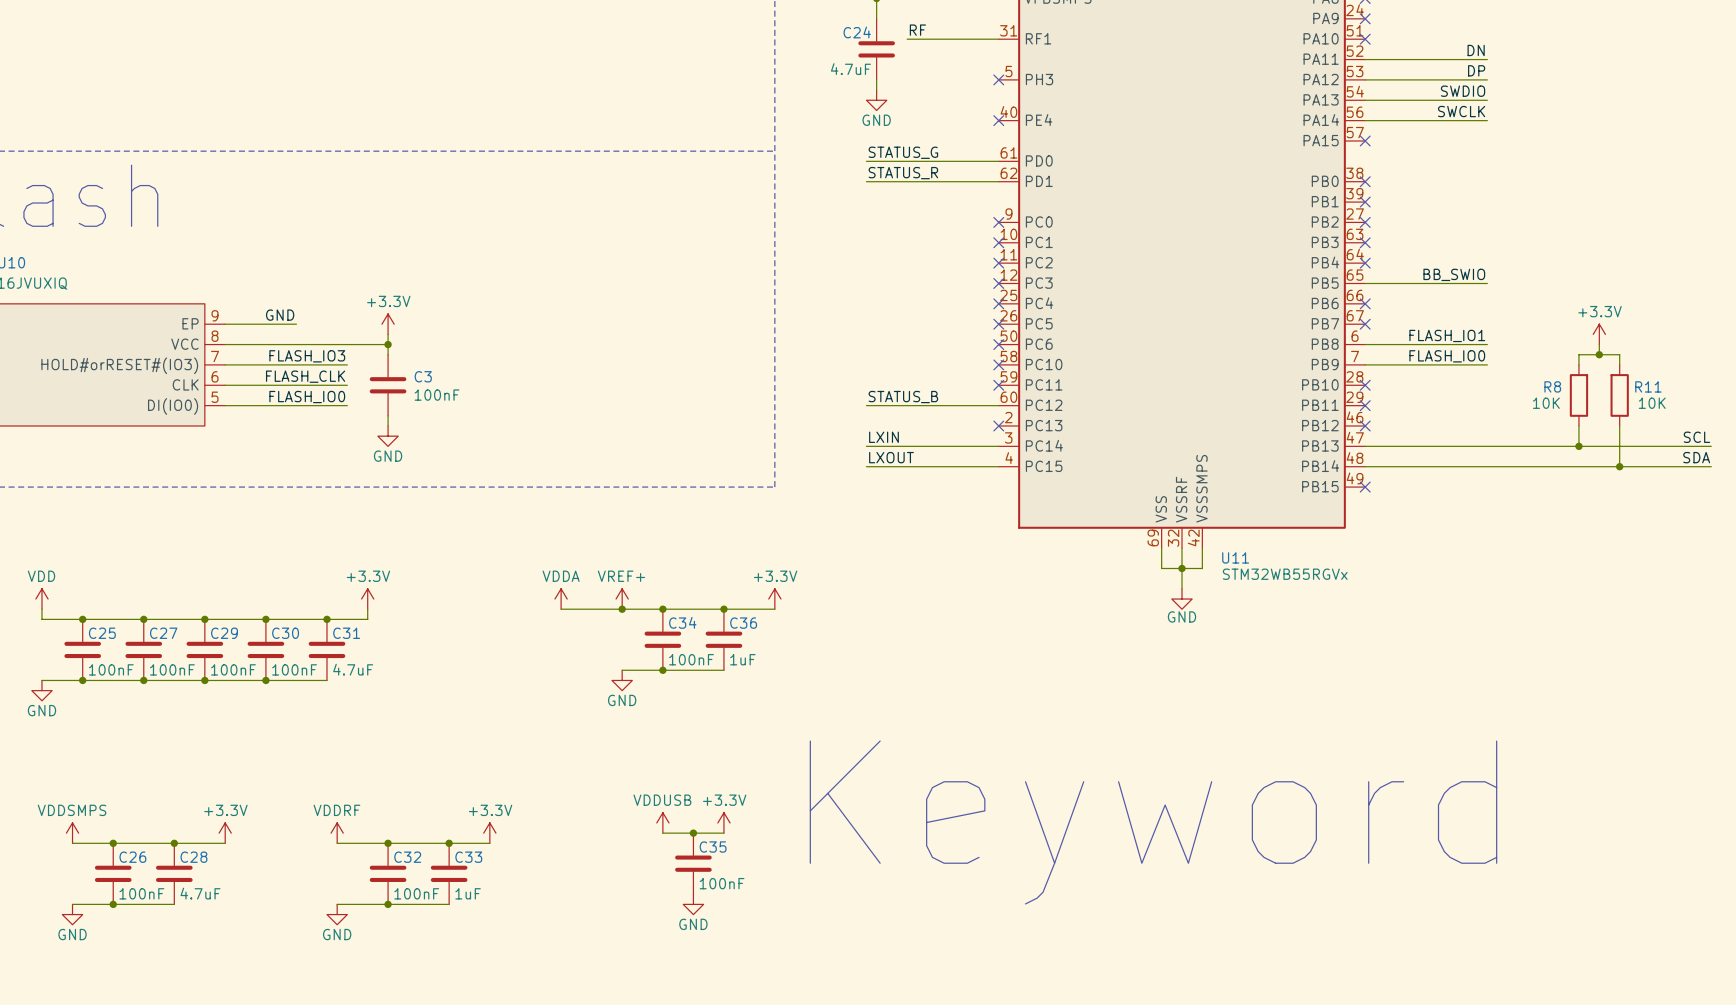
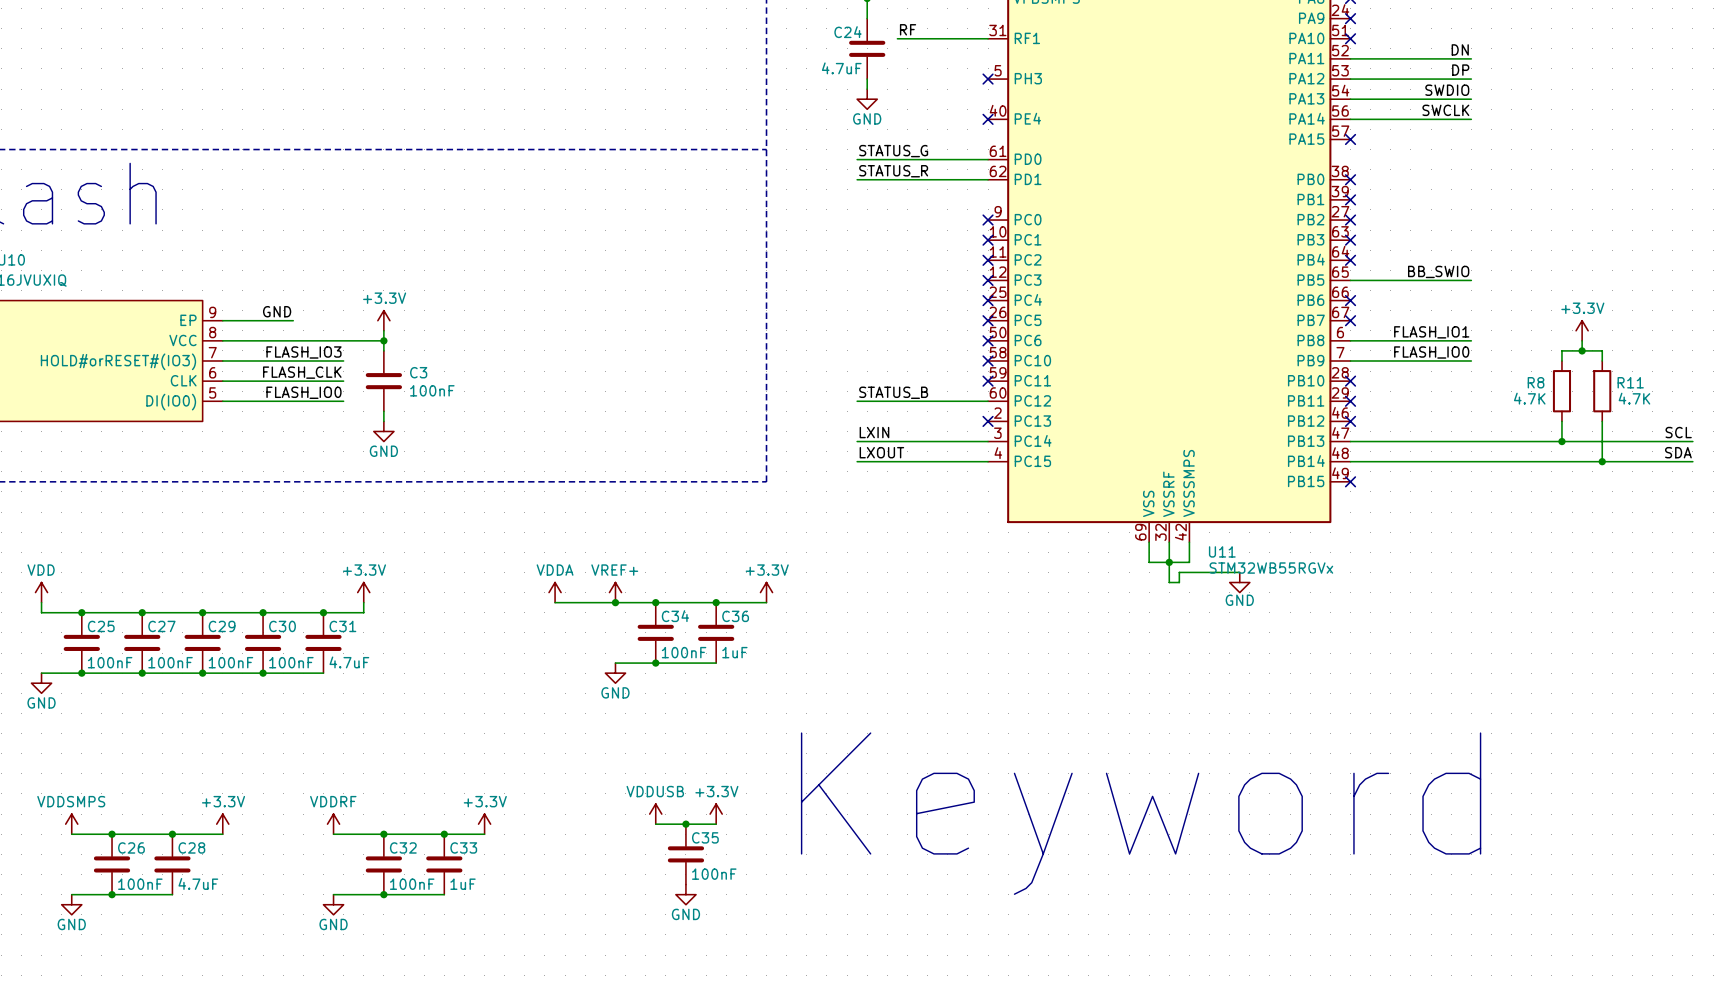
R8 value: 10K (1546, 403) -> 4.7K (1529, 398)
R11 value: 10K (1652, 403) -> 4.7K (1634, 398)
wire: none -> (1239, 572) (1179, 572) (1179, 582) (1169, 582)
power symbol position: GND (1182, 599) -> GND (1239, 582)

